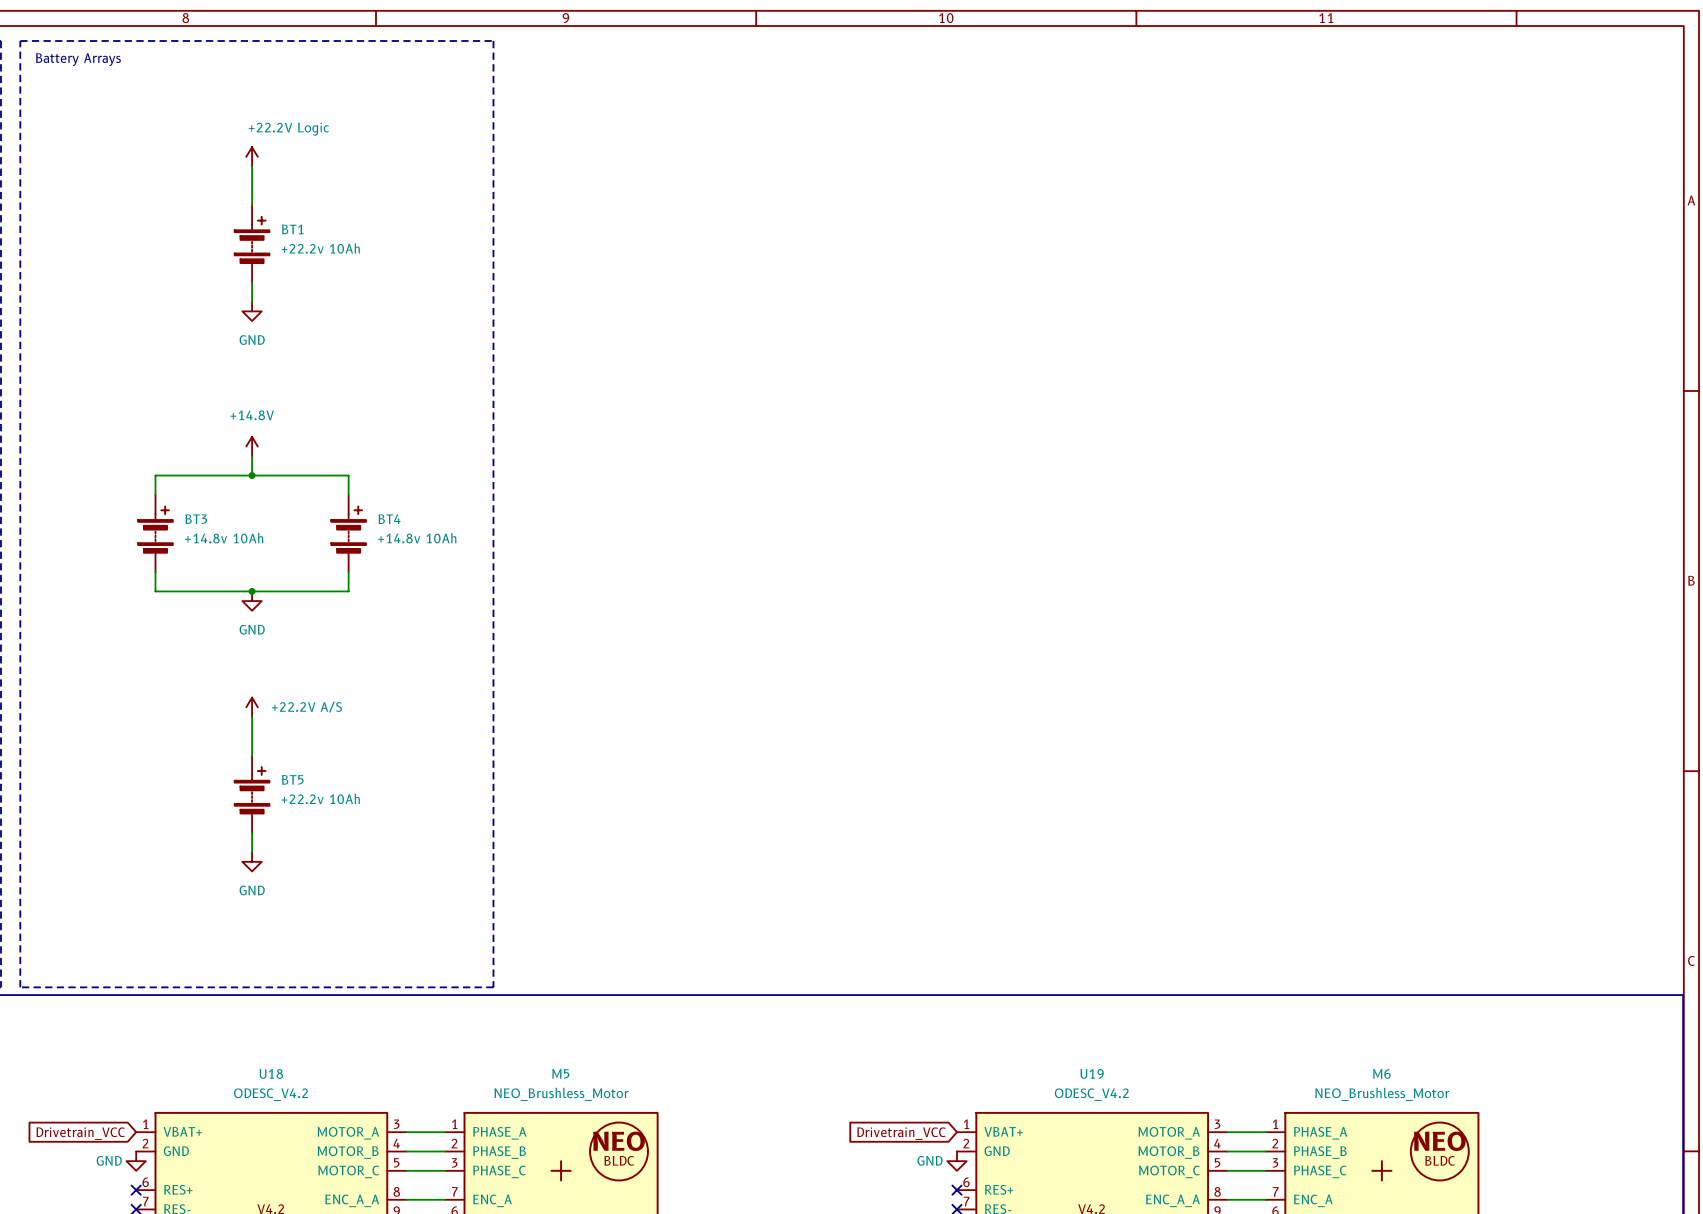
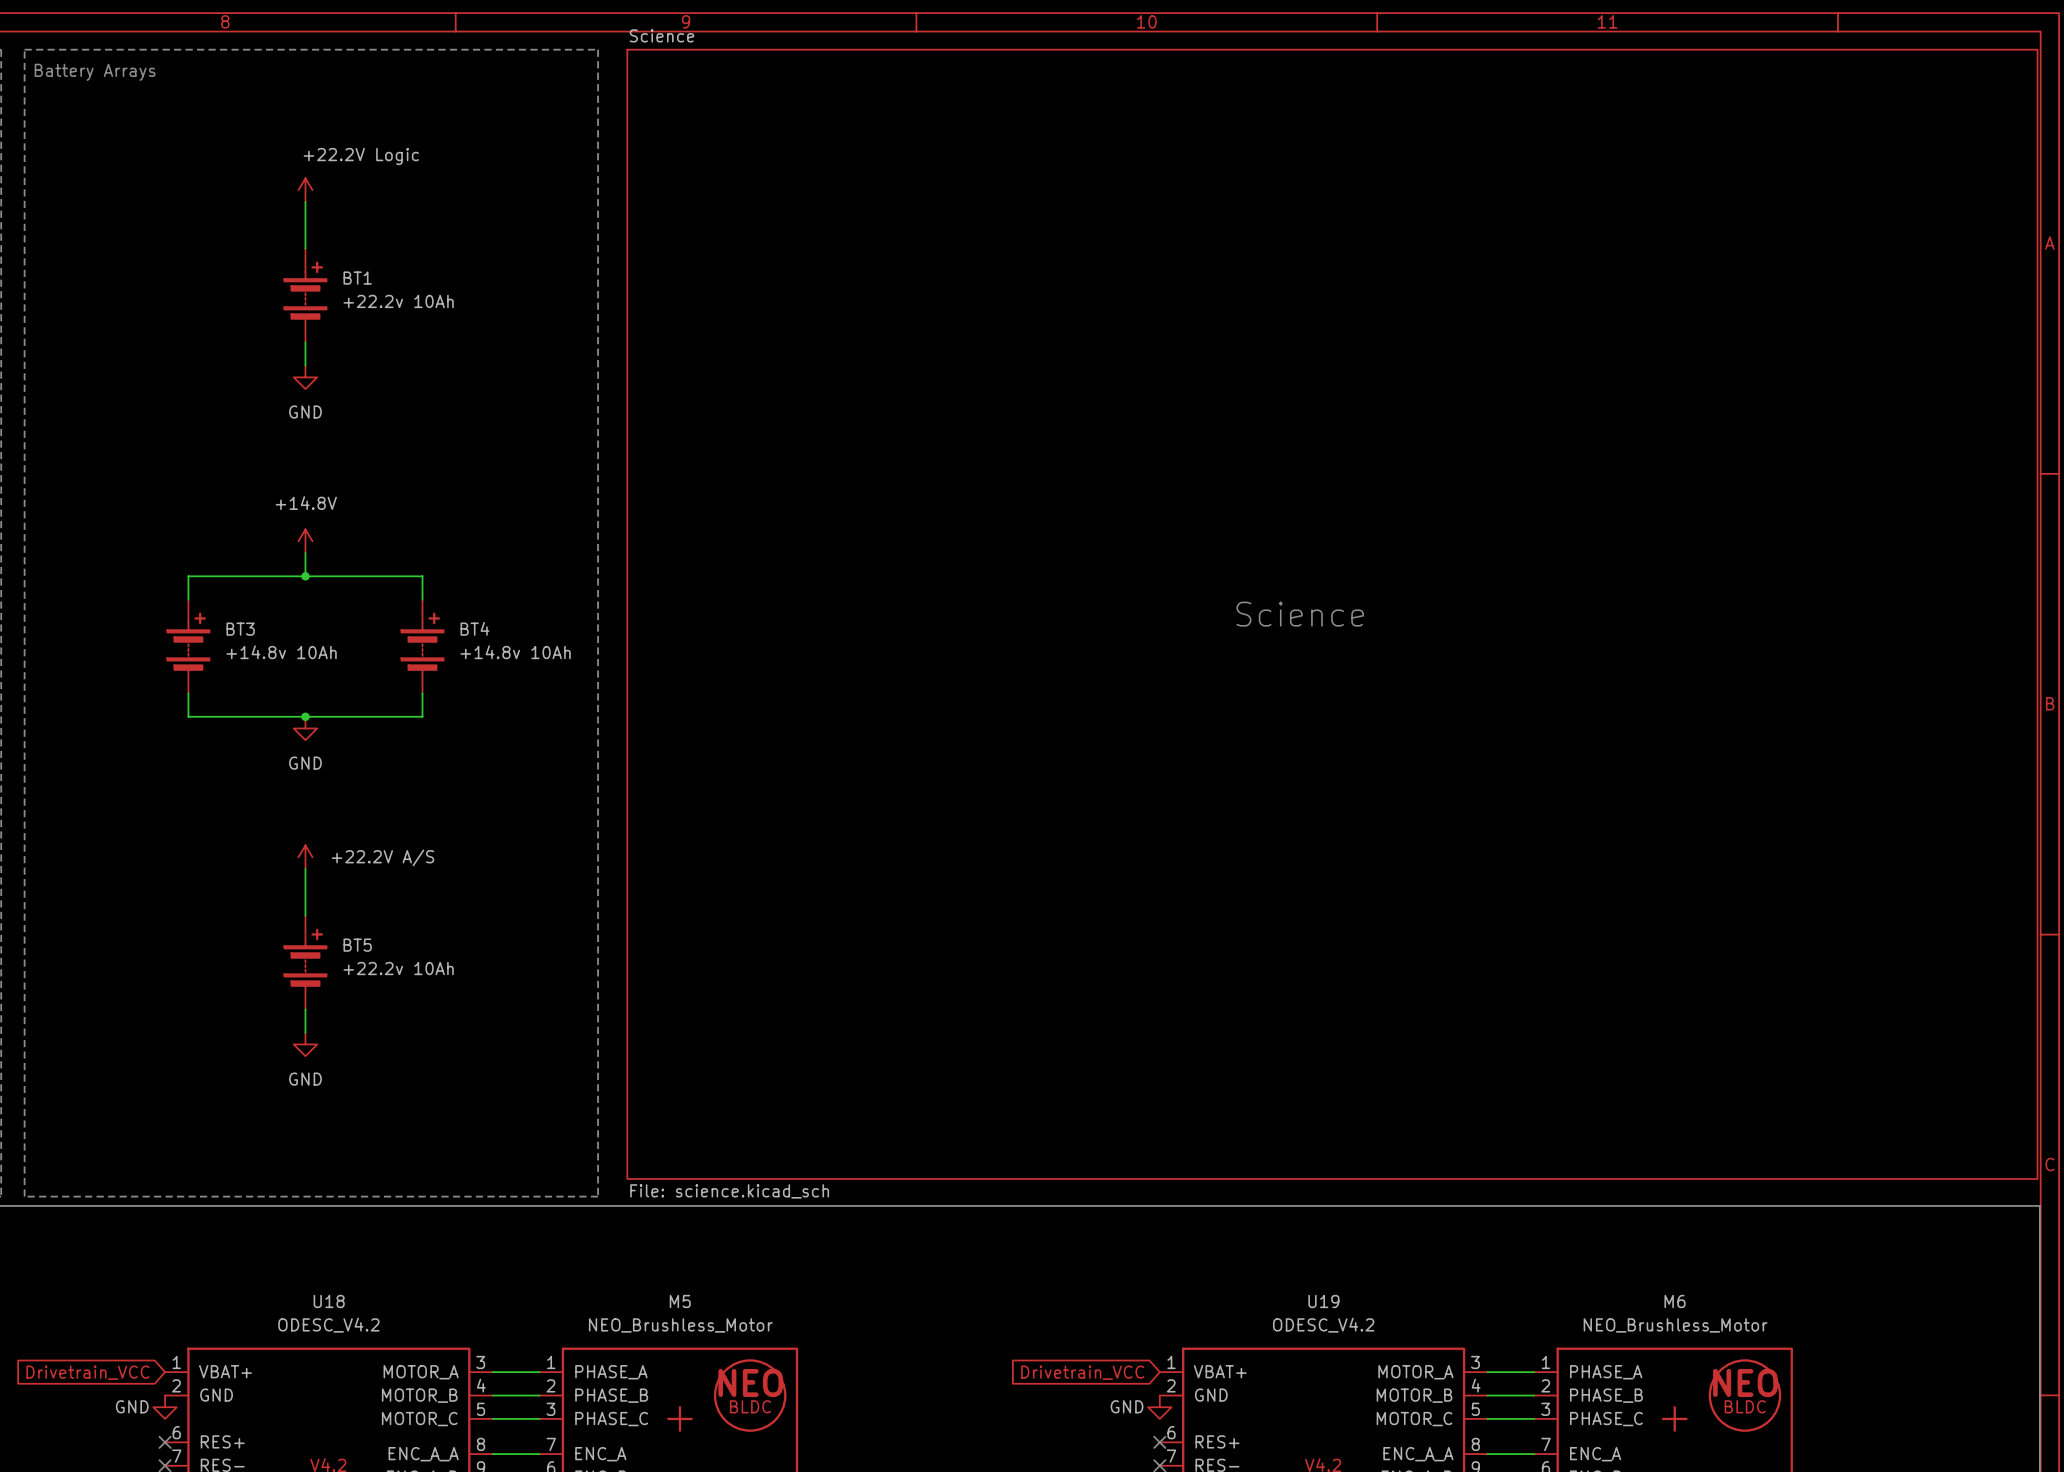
text: none -> Science (1300, 614)
sheet Science: none -> File: science.kicad_sch (1332, 614)

